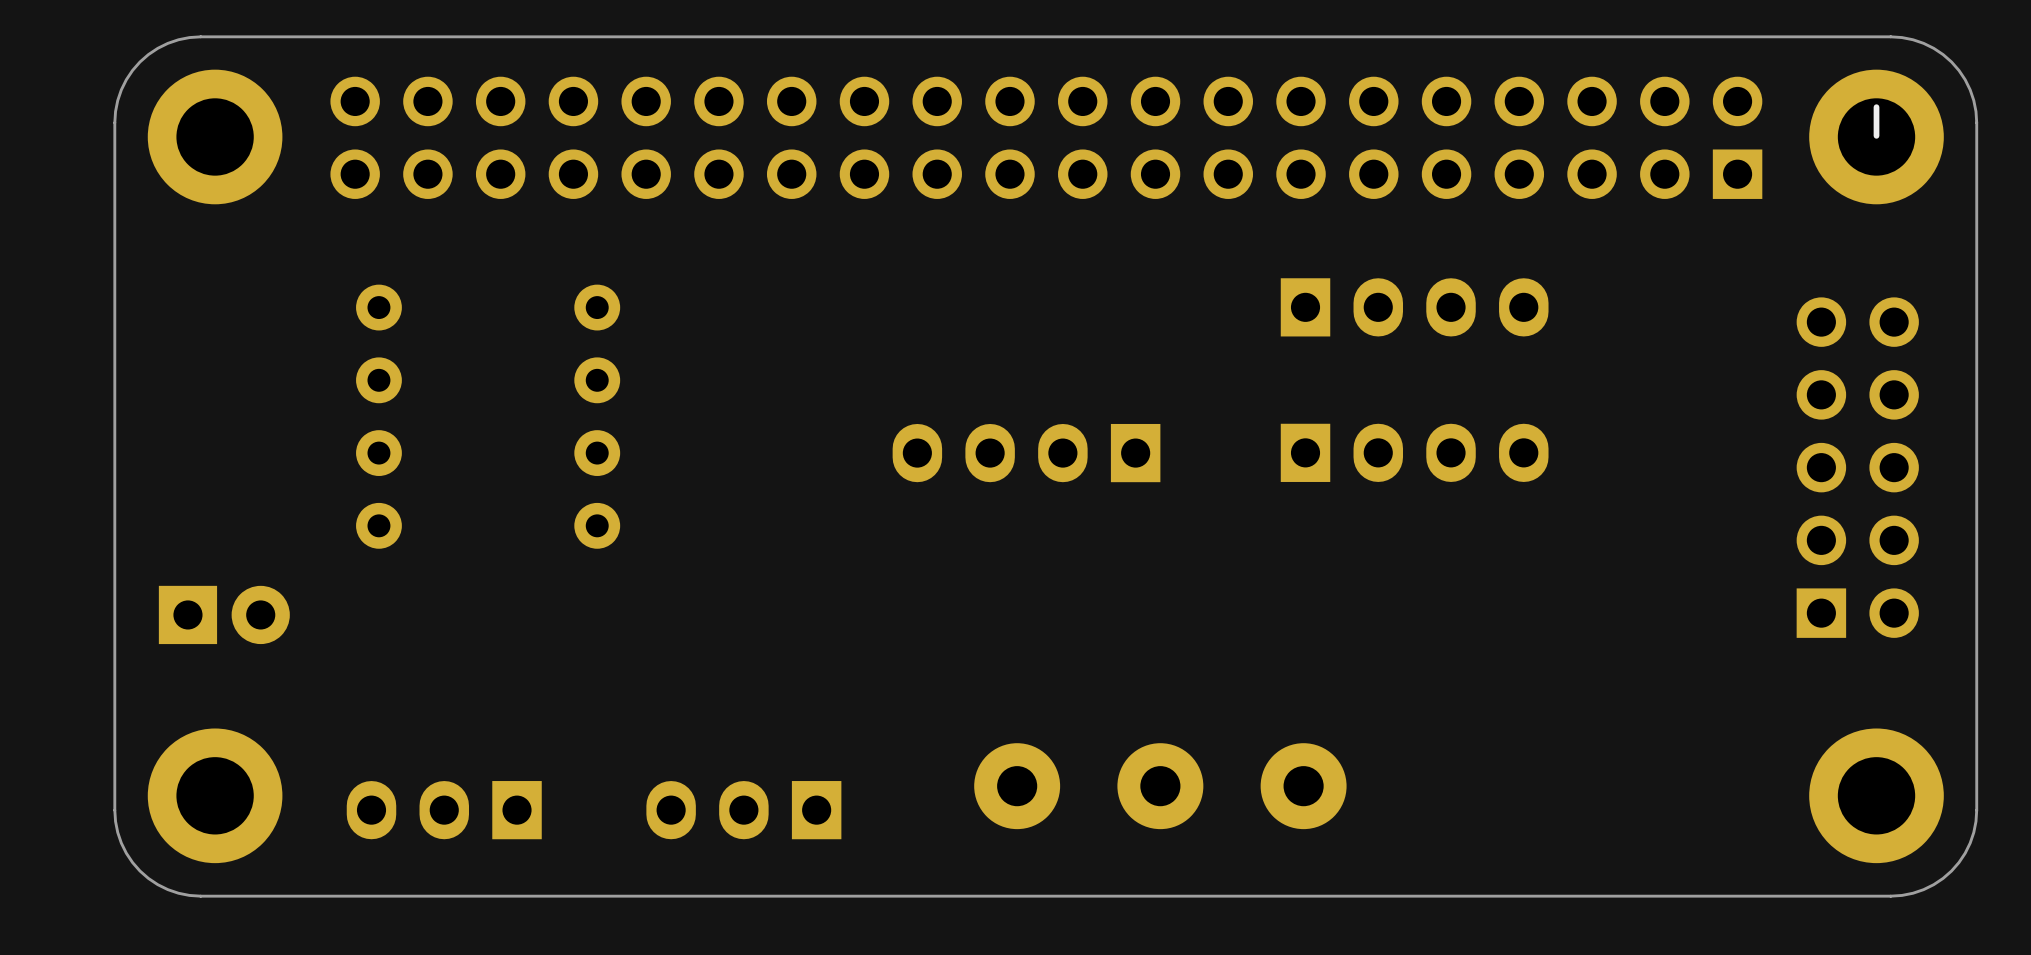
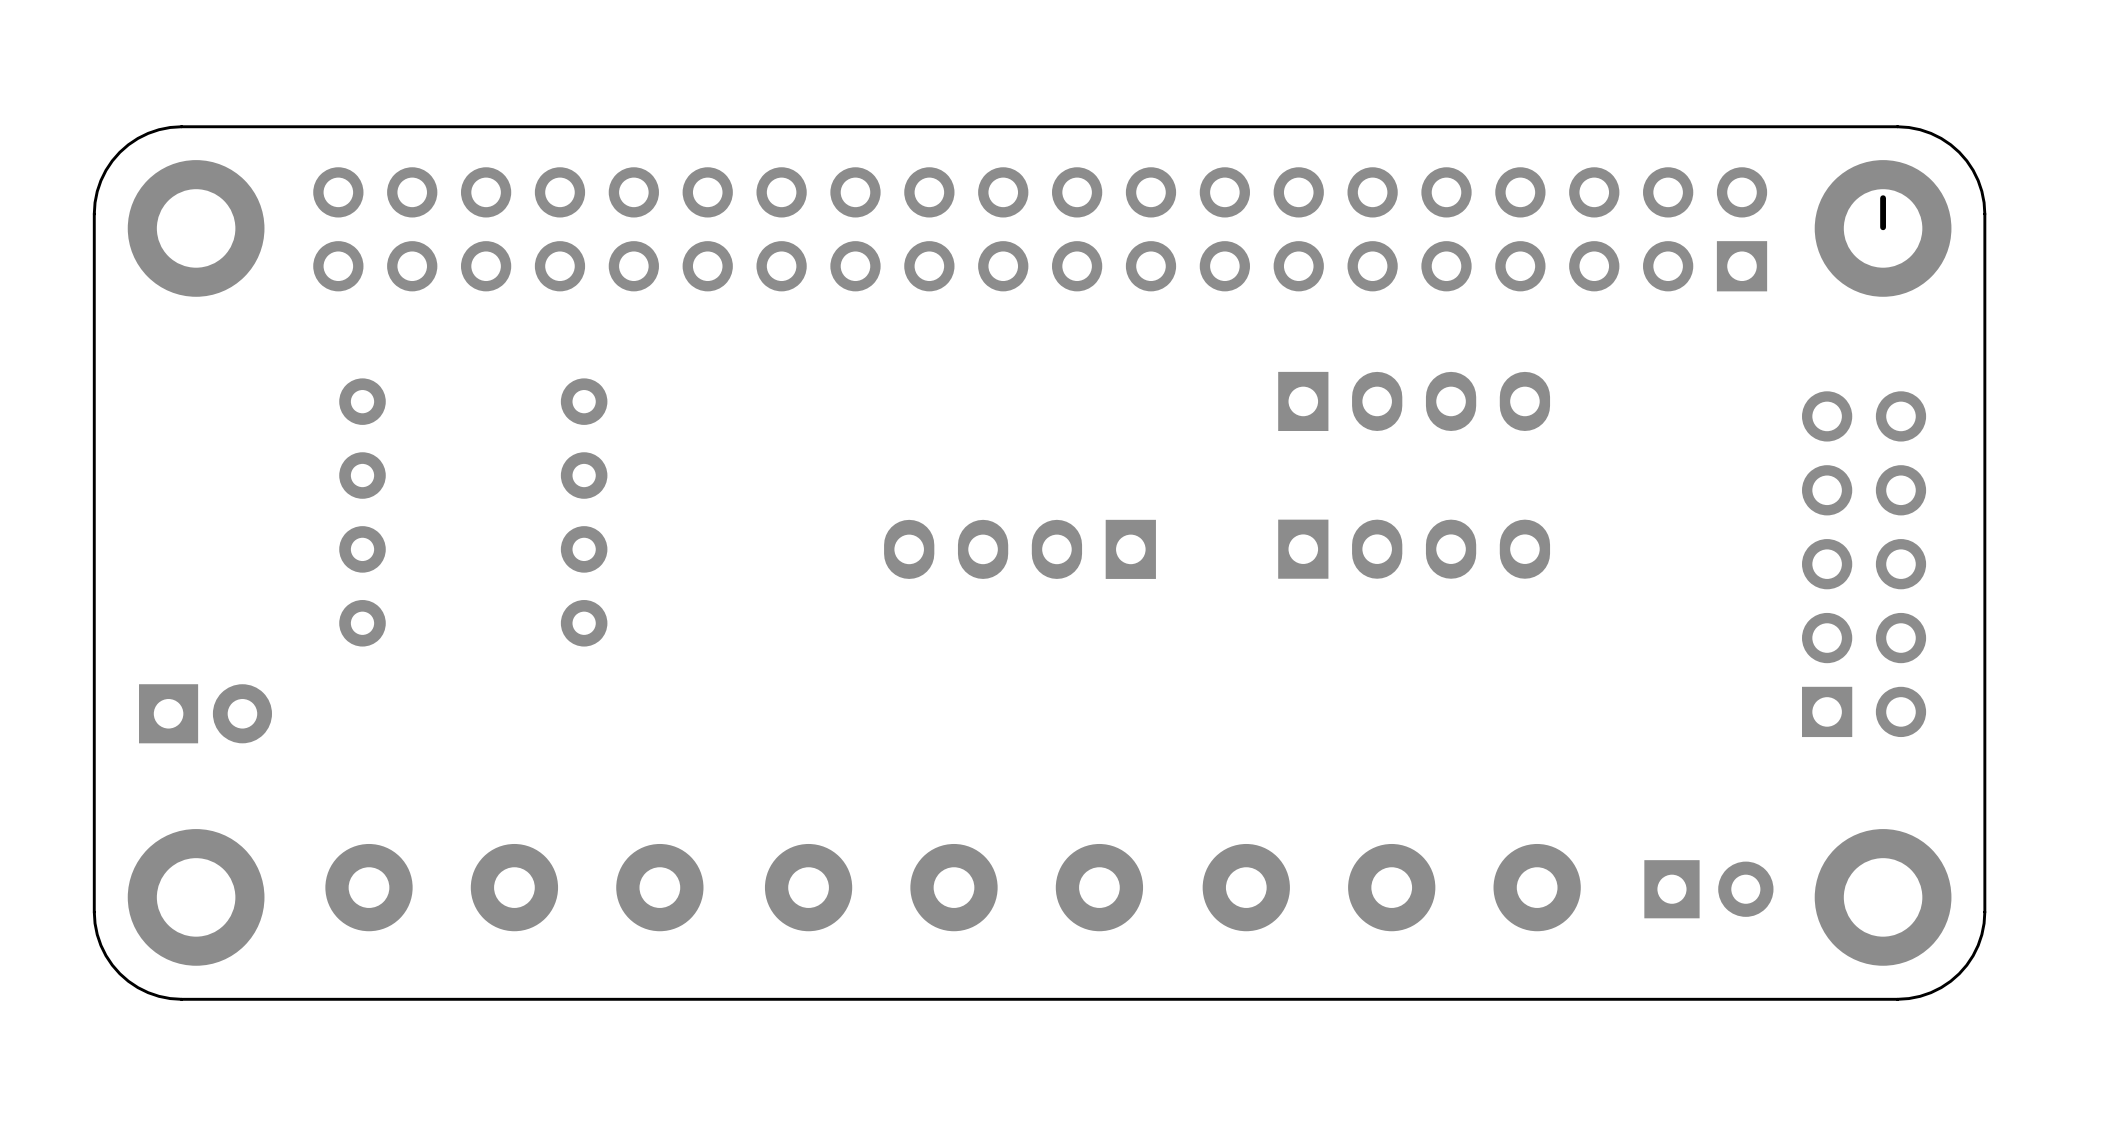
part: none -> (514, 887)
part: none -> (954, 887)
part: (1160, 786) -> none
part: none -> (1391, 887)
part: none -> (1708, 889)
part: (444, 810) -> none
part: (743, 810) -> none

